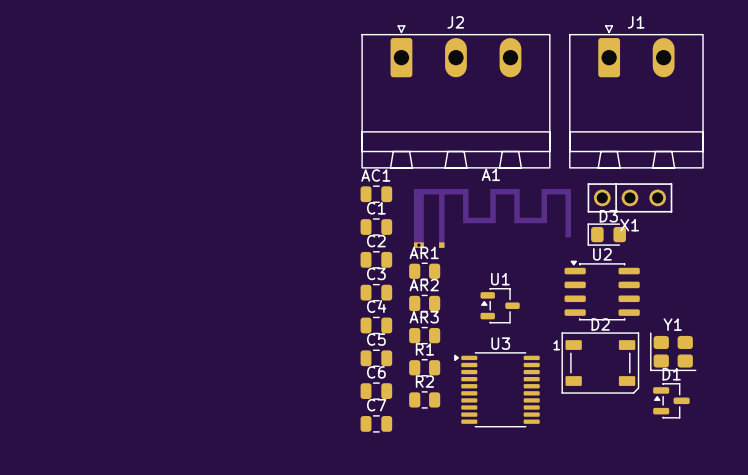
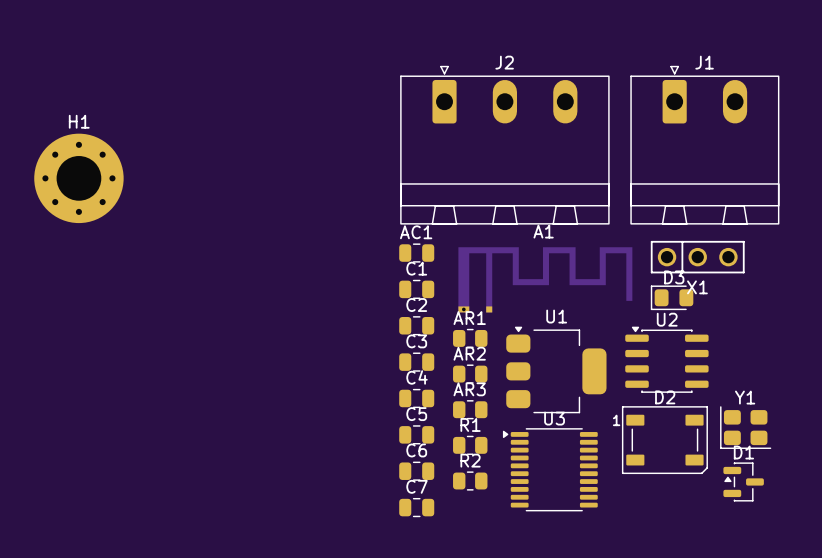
H1: none -> (78, 178)
U1 footprint: [480, 288, 520, 324] -> [506, 326, 607, 414]

